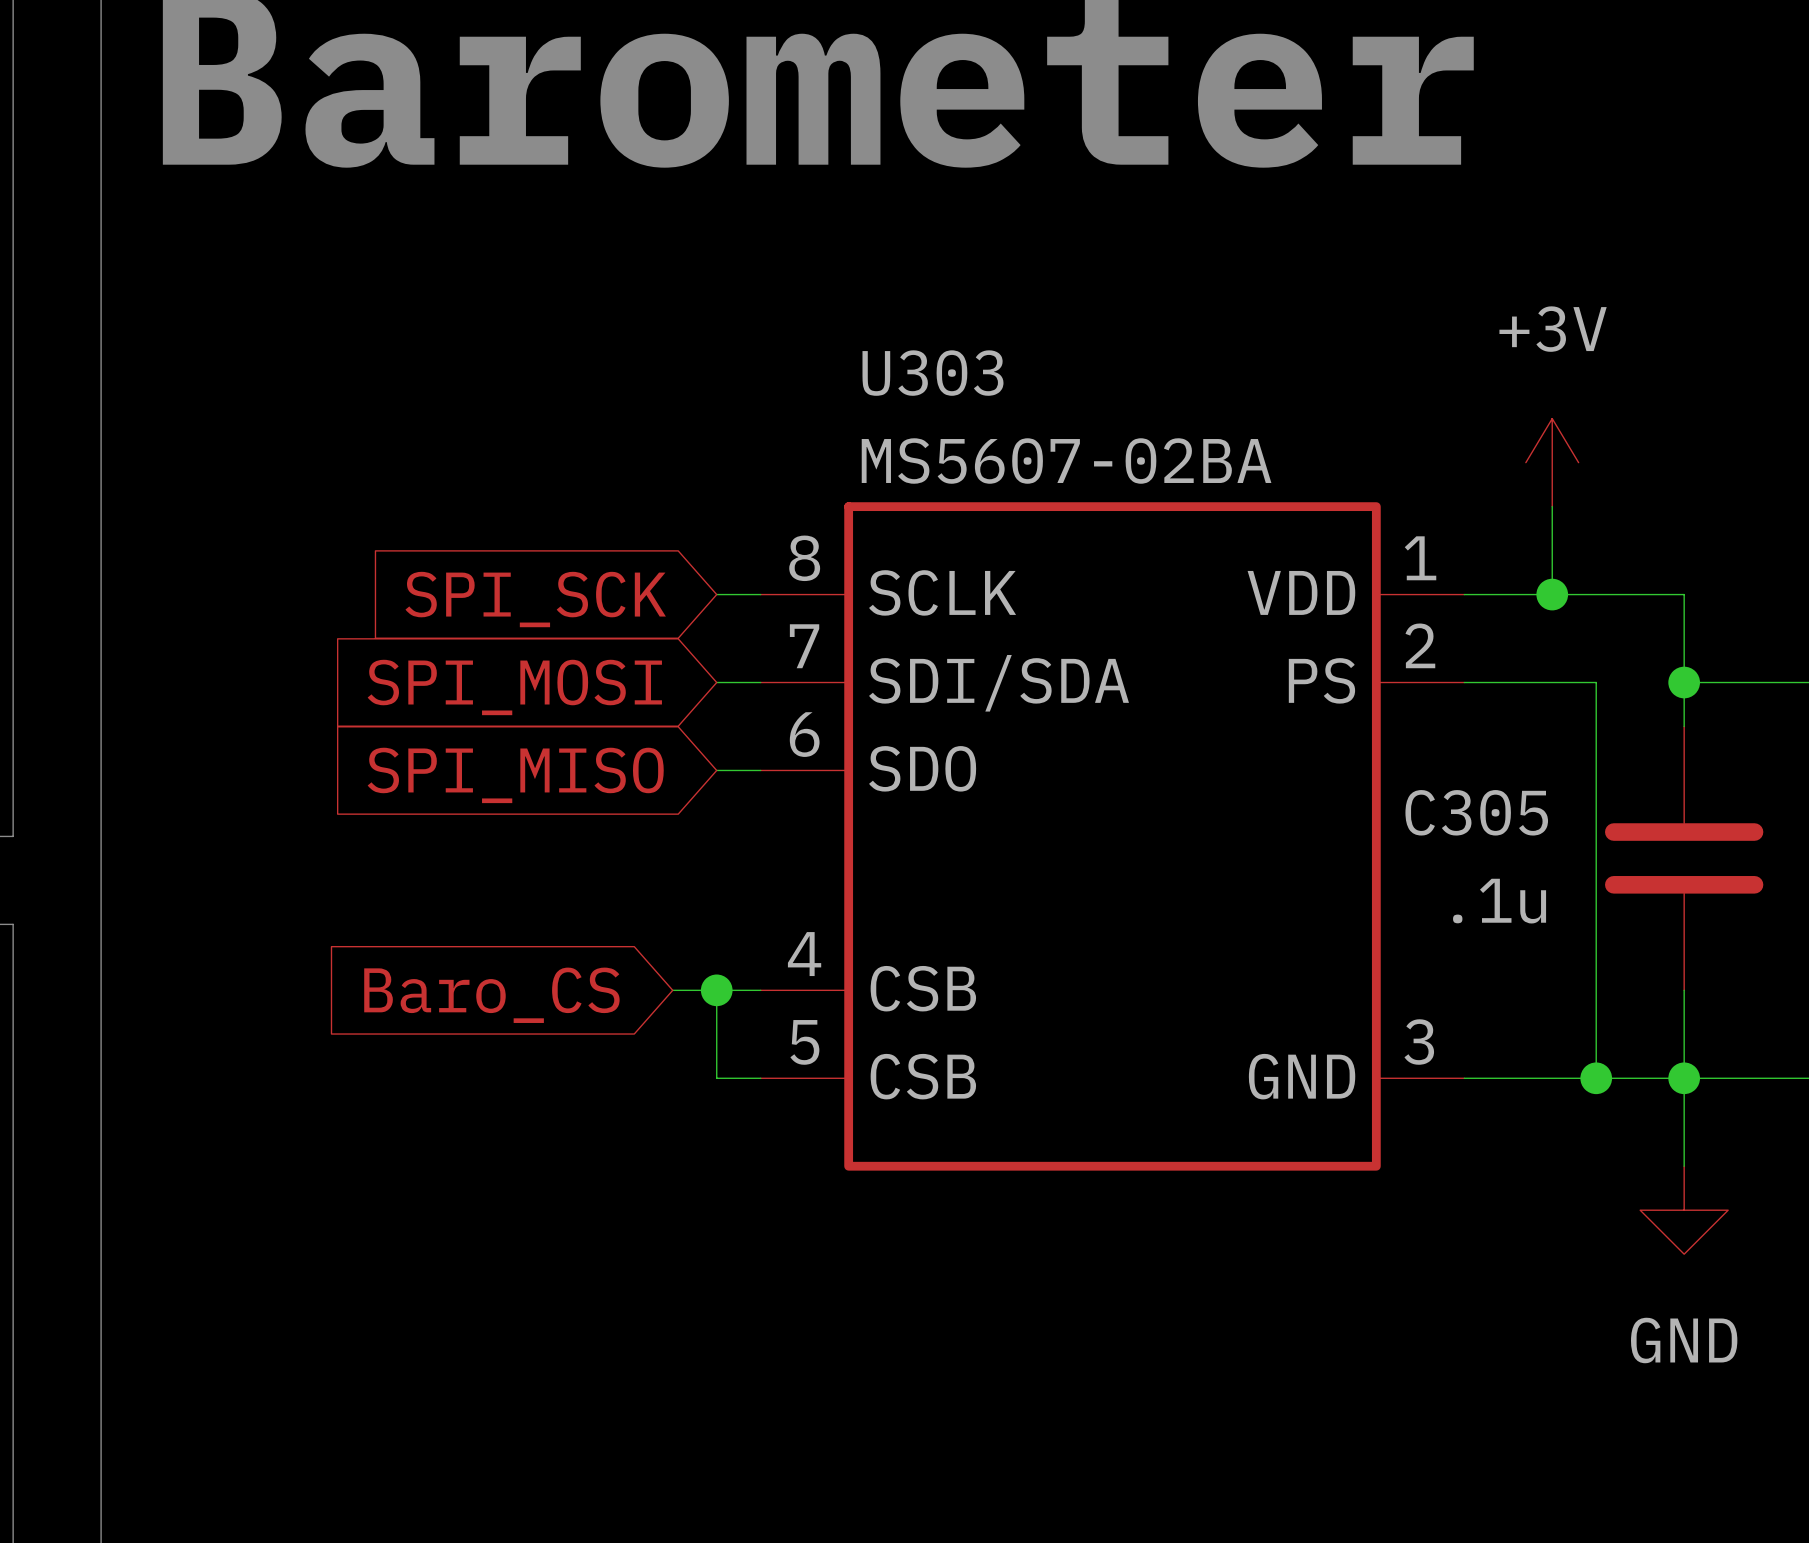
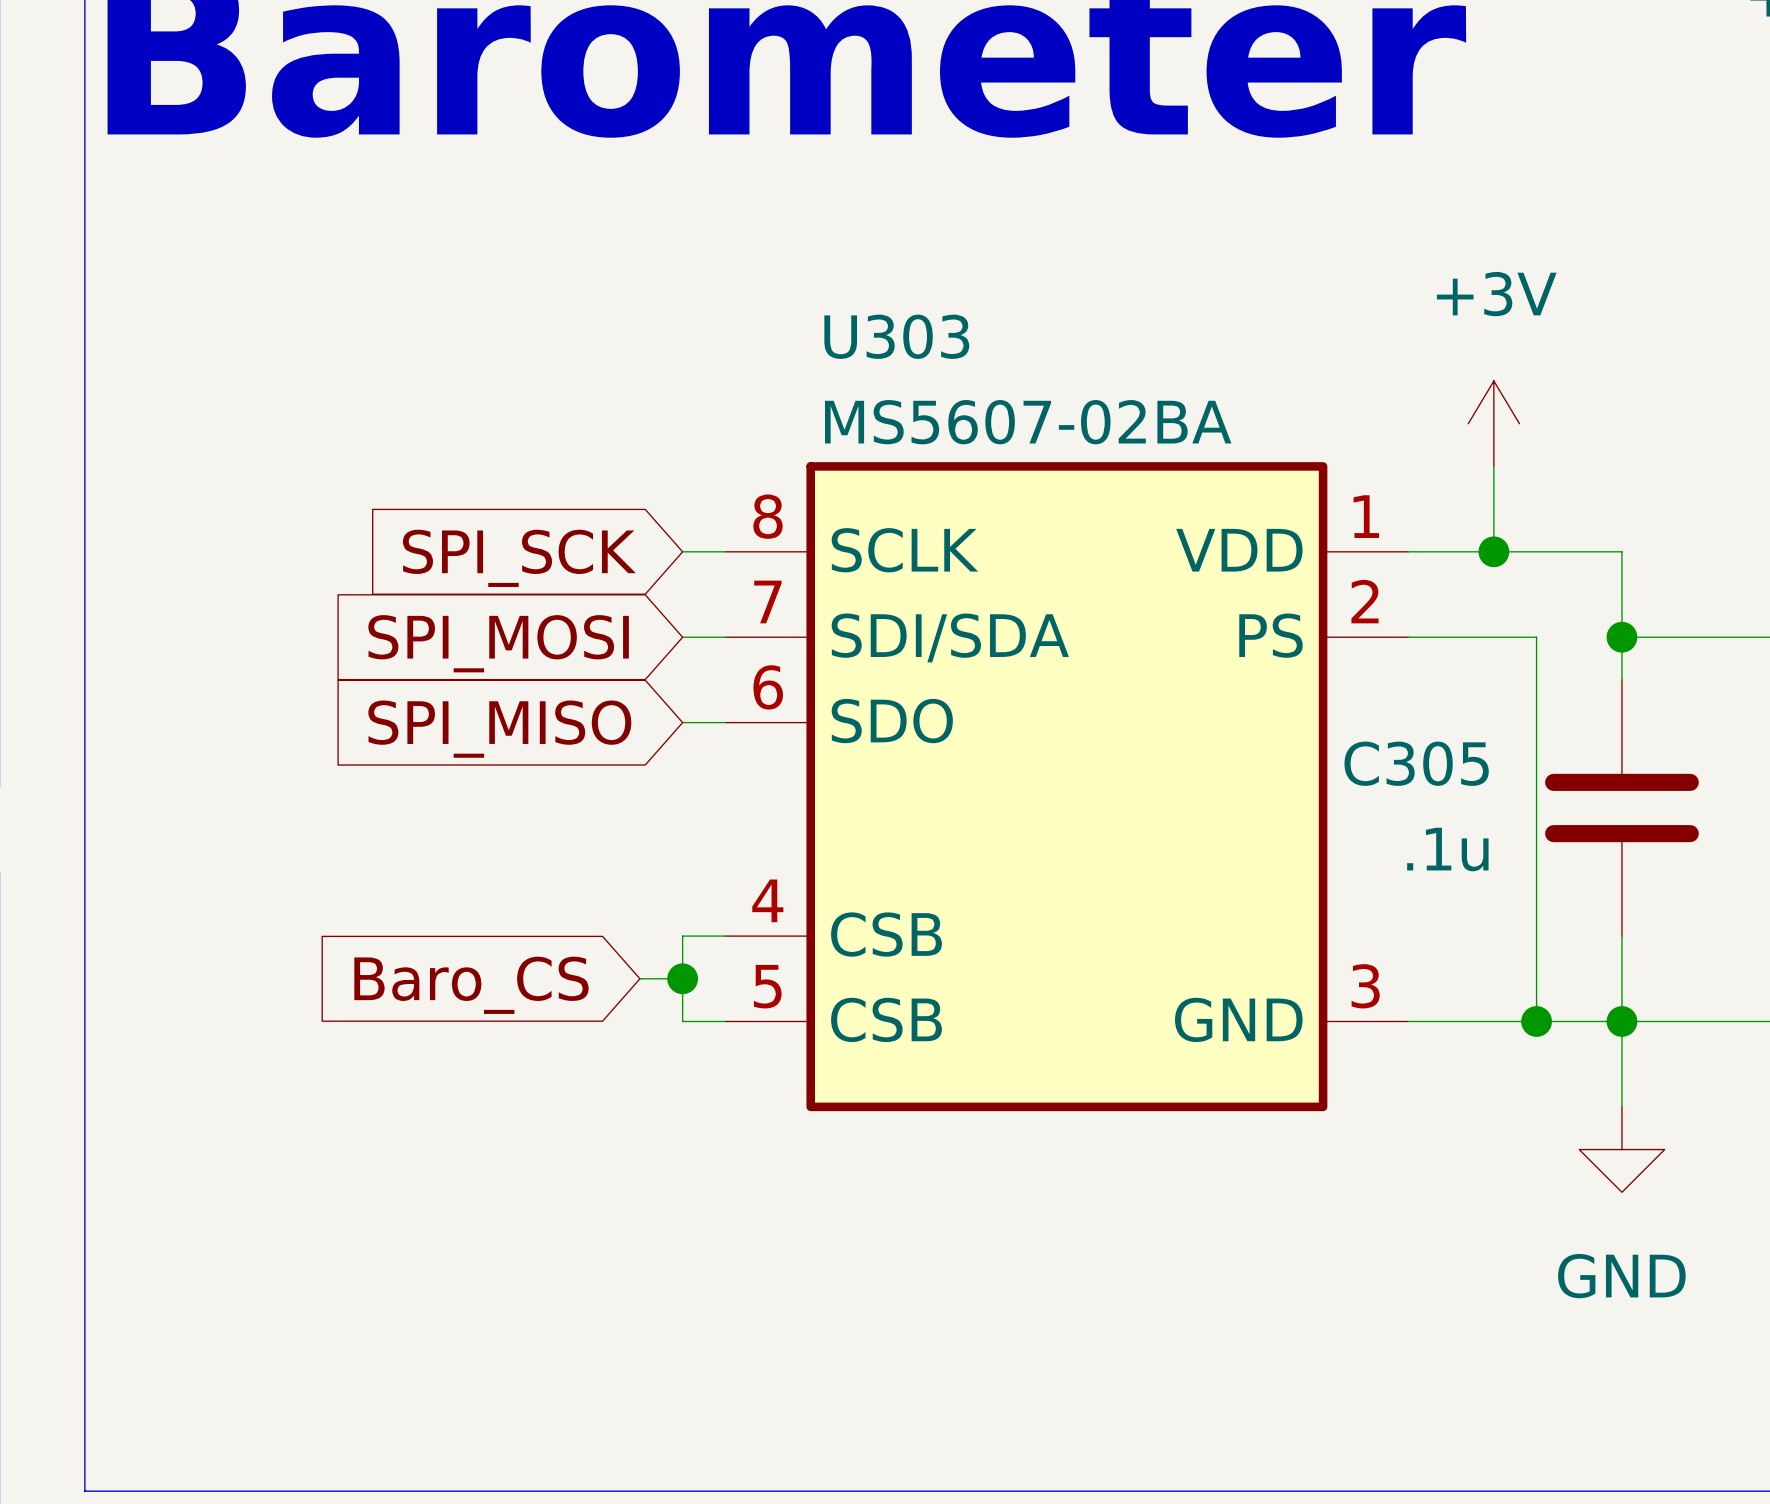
wire: (672, 990) (716, 990) -> (639, 978) (682, 978)
junction position: (716, 990) -> (682, 978)
global label position: Baro_CS (491, 995) -> Baro_CS (471, 985)

